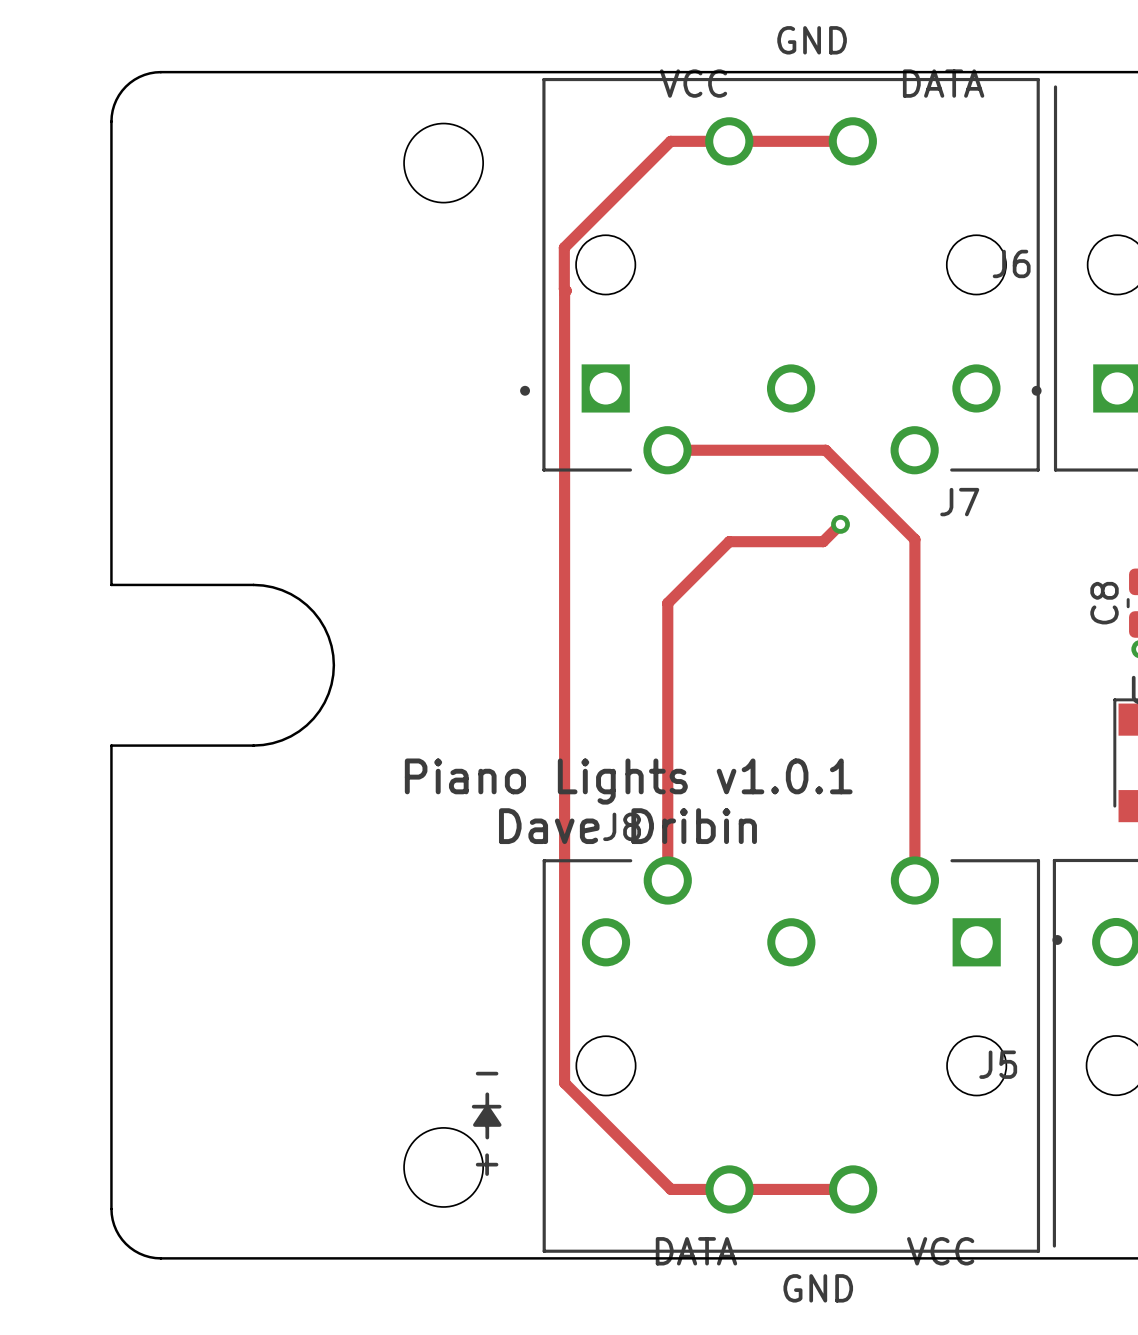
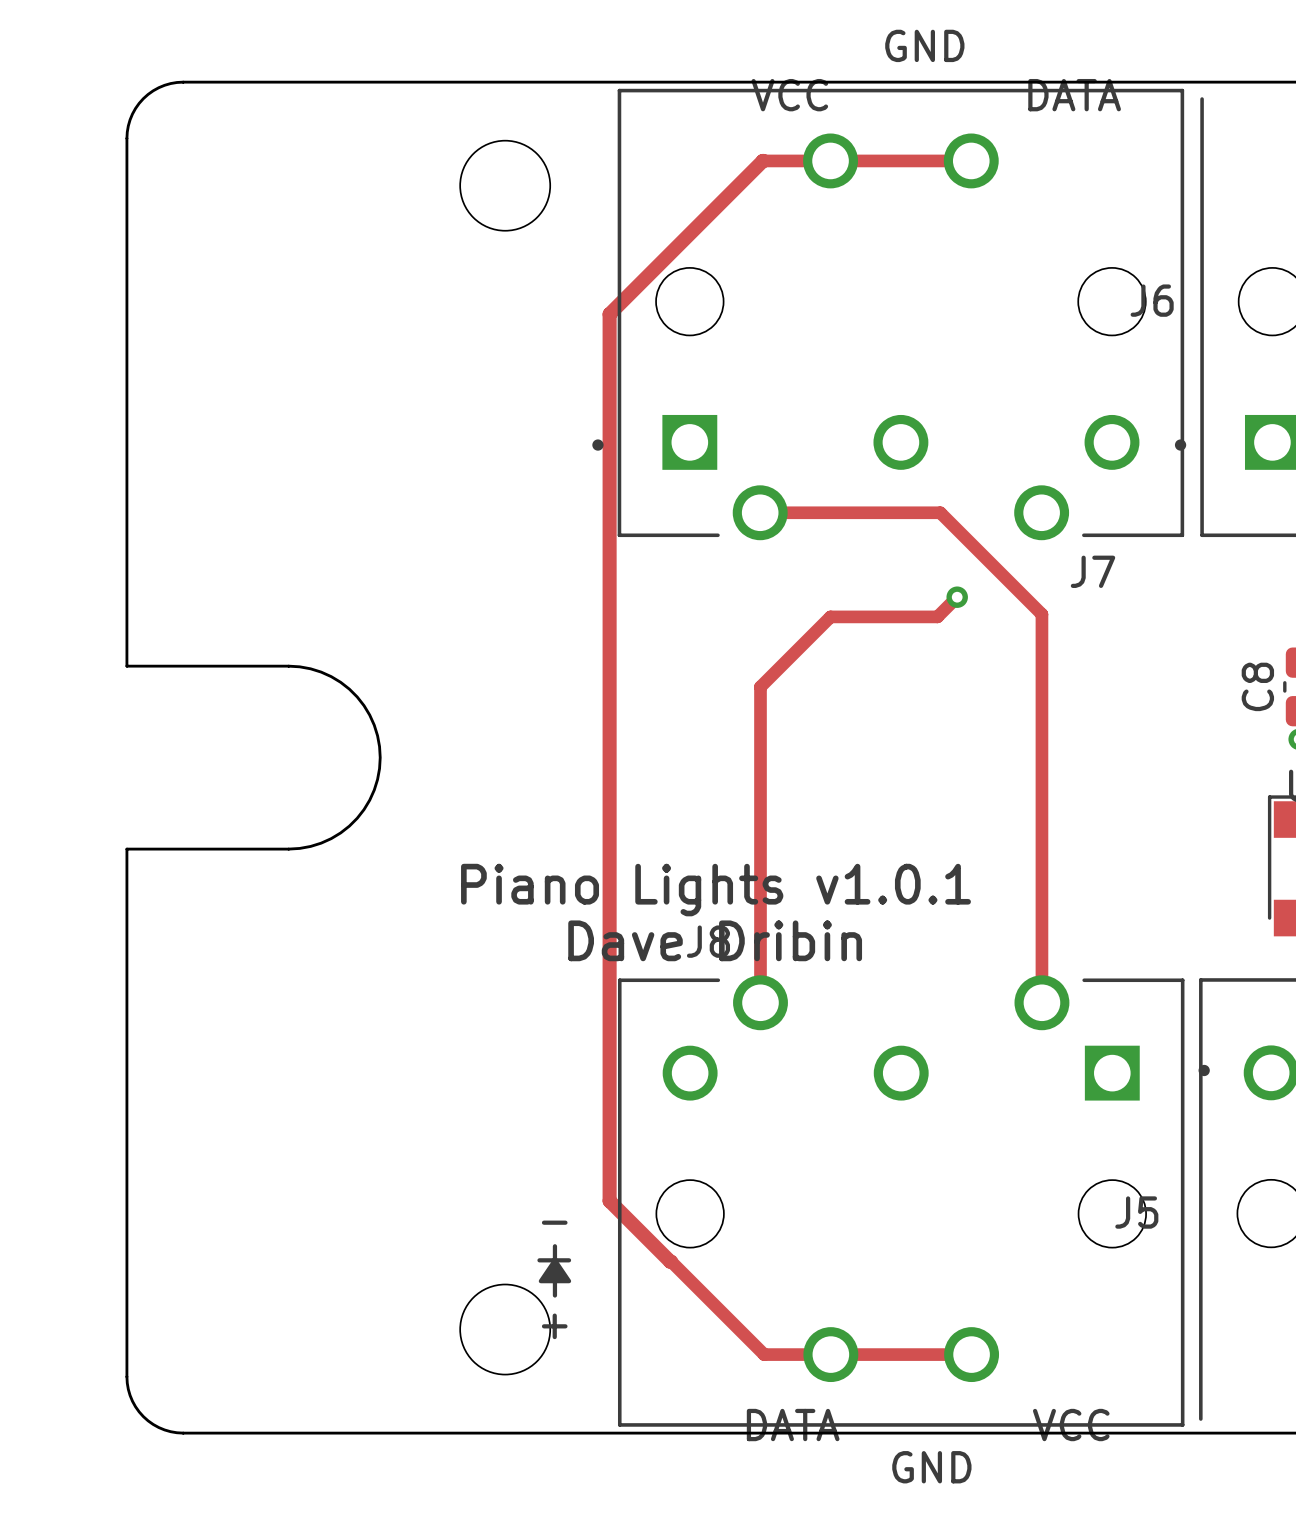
track: (670, 141) (564, 247) (564, 288) (566, 290) (564, 292) (564, 1083) (589, 1107) -> (763, 160) (609, 314) (609, 1201) (671, 1261)

